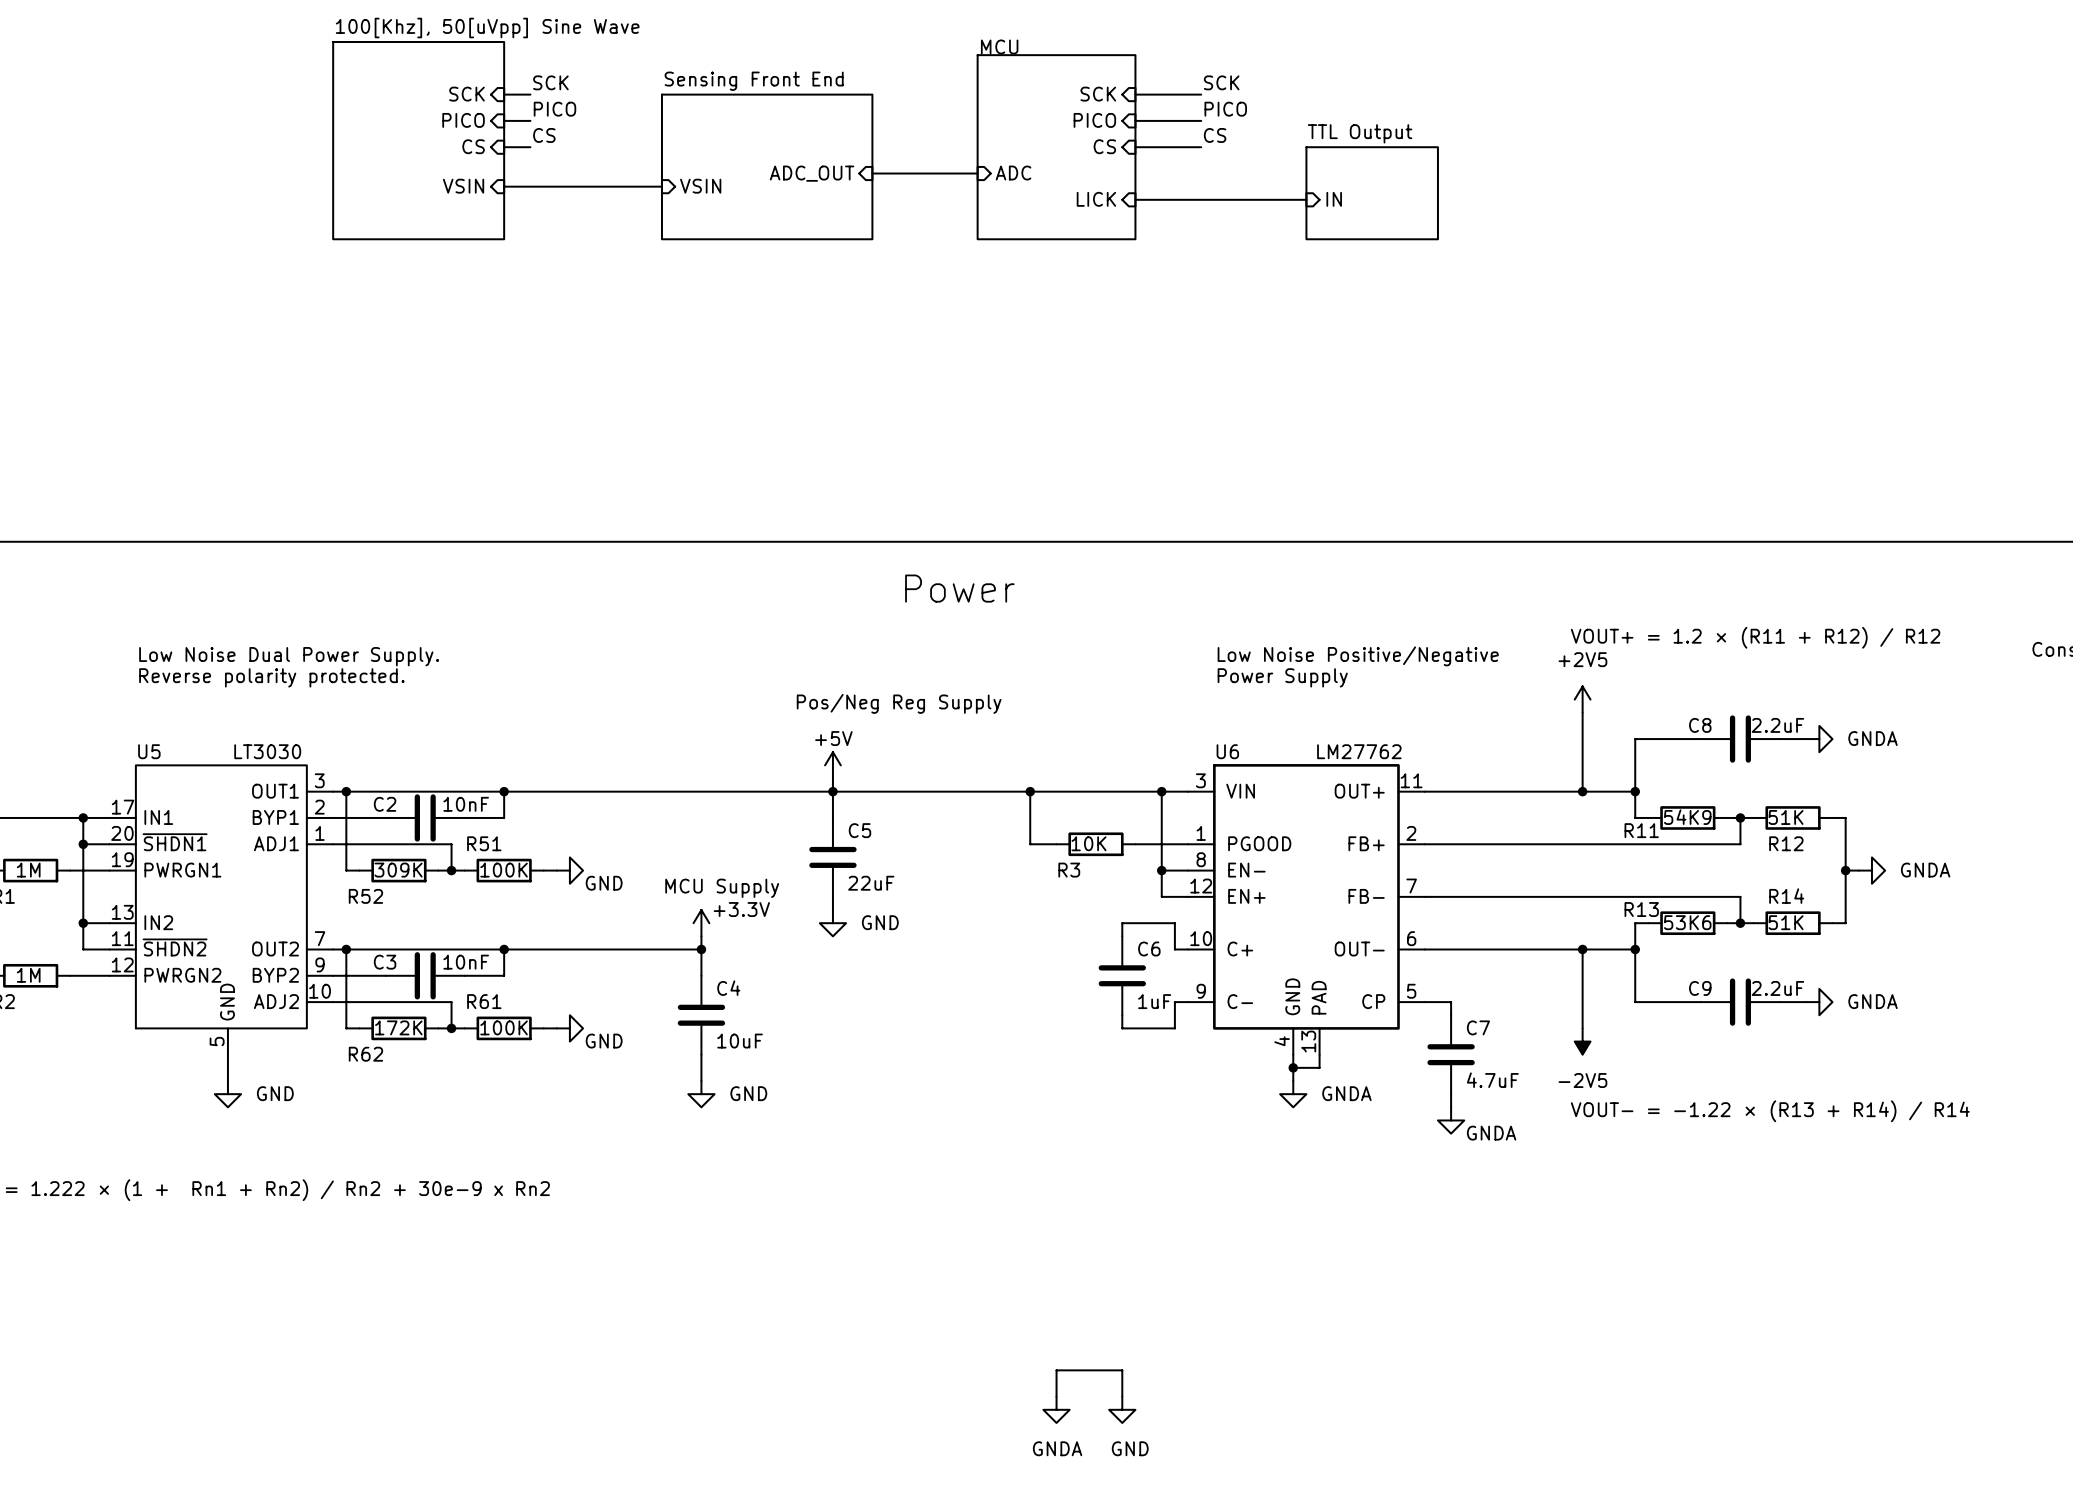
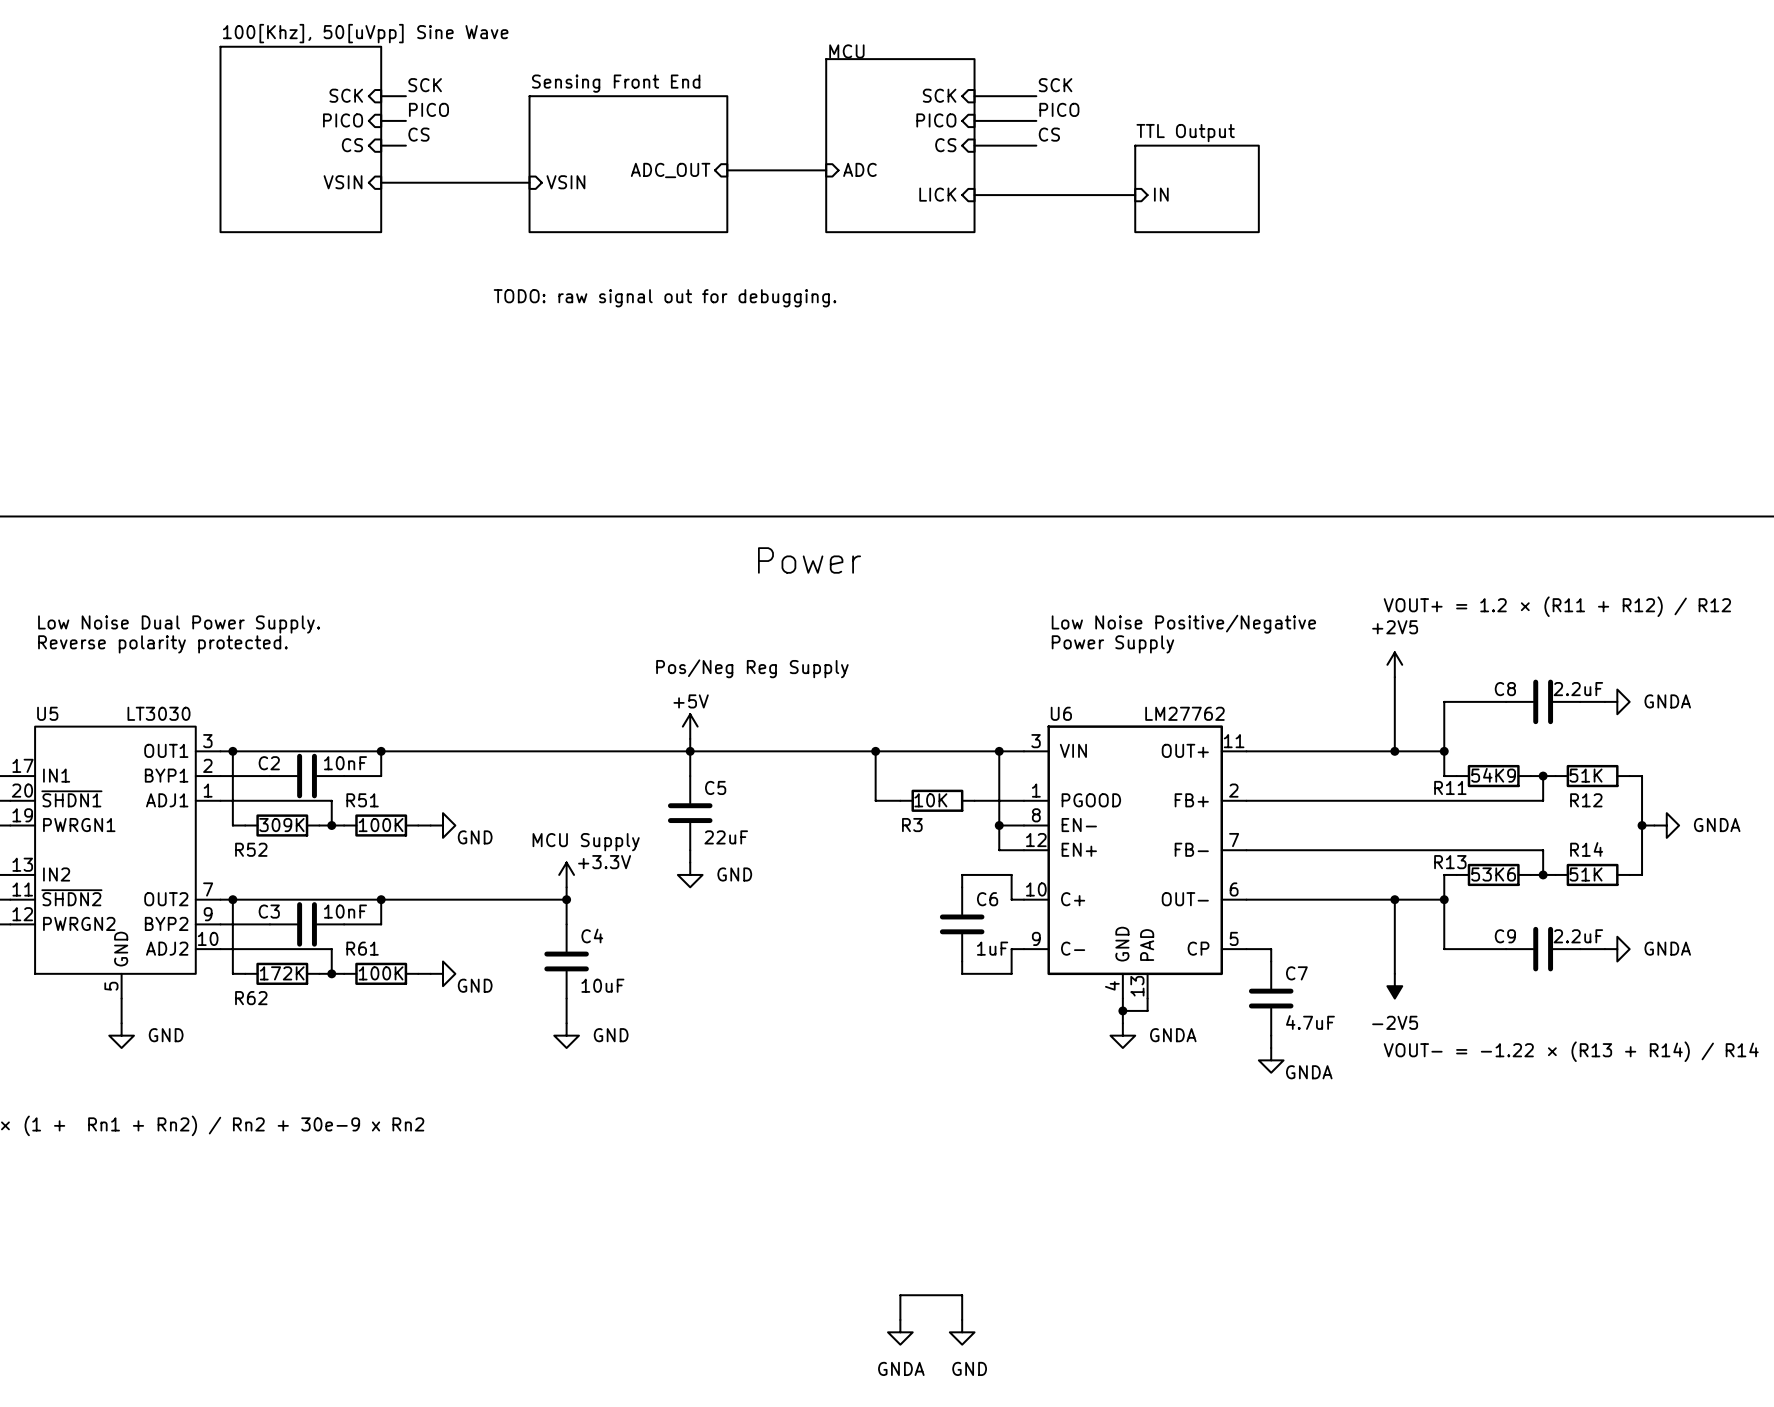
text: none -> TODO: raw signal out for debugging. (665, 298)

